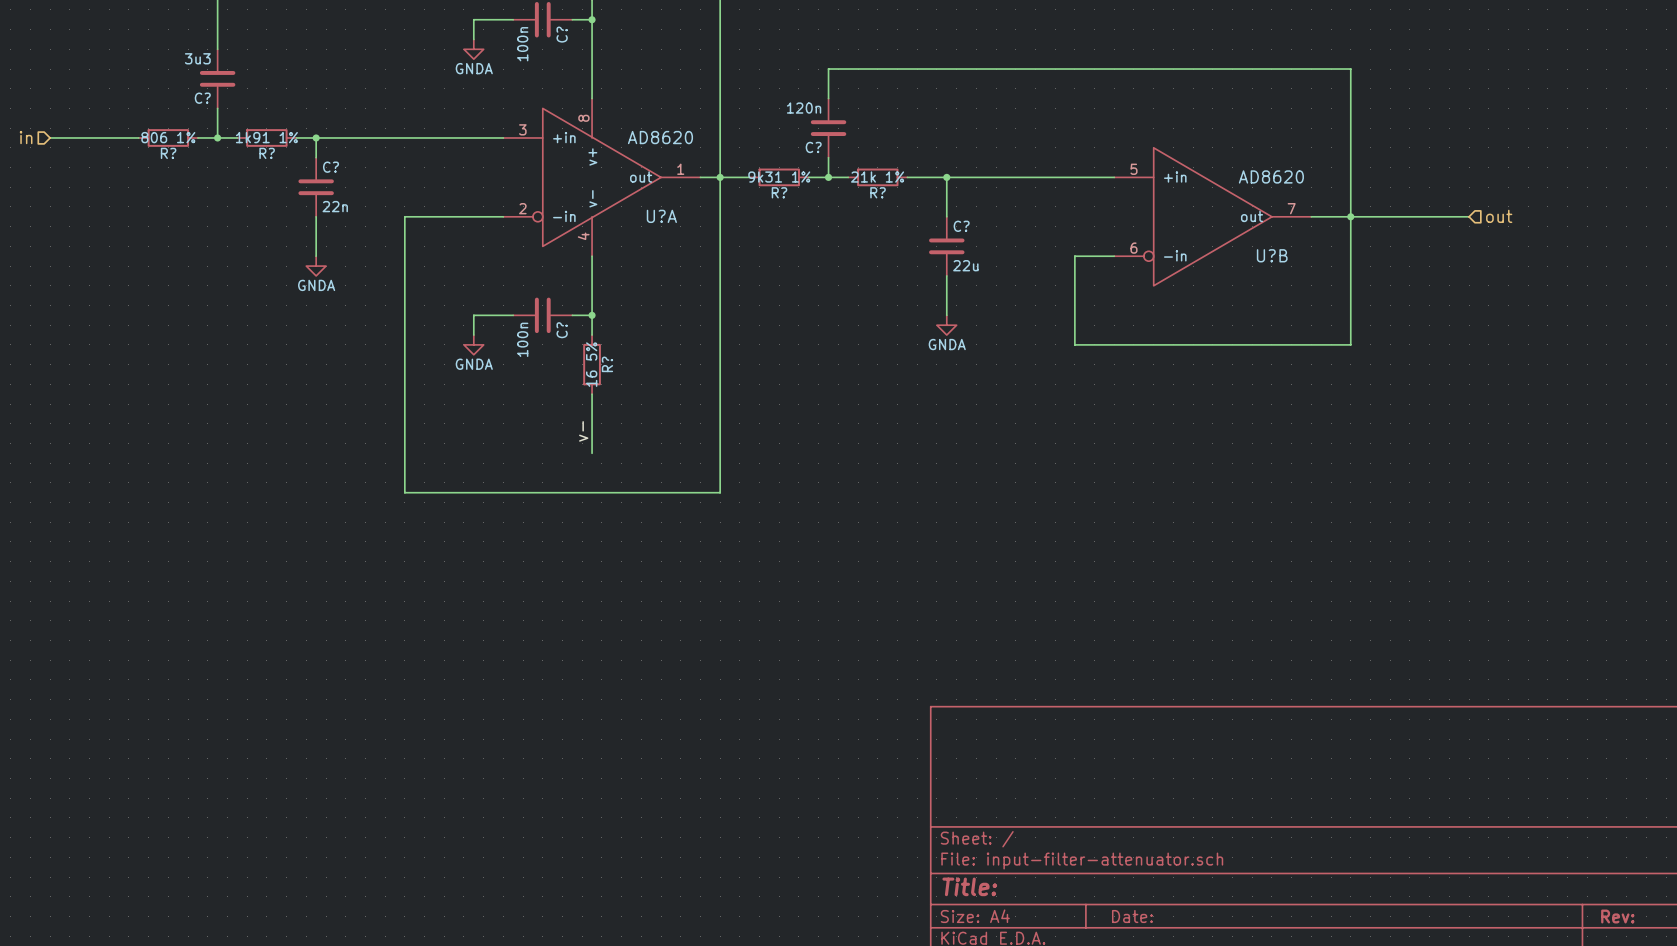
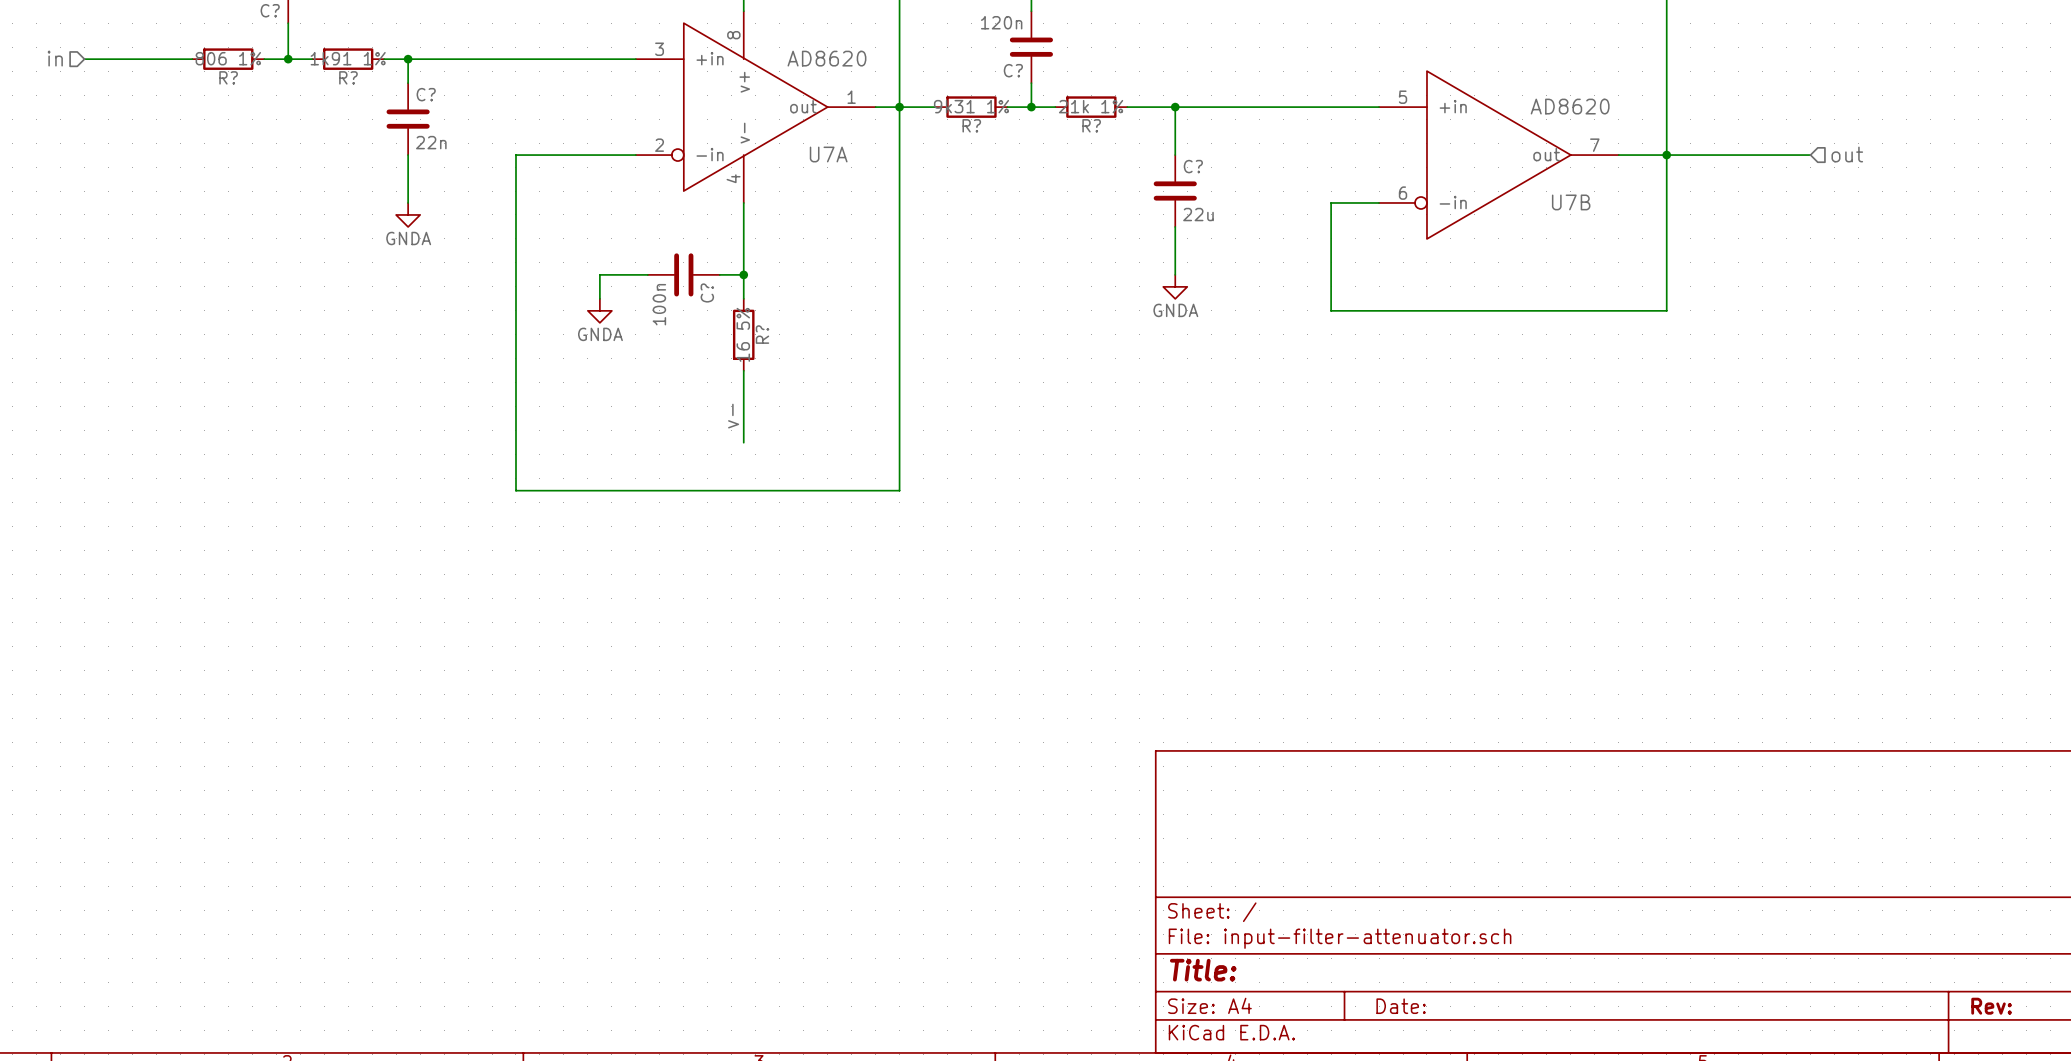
U?A name: U?A (661, 216) -> U7A (828, 154)
U?B name: U?B (1272, 255) -> U7B (1571, 202)

